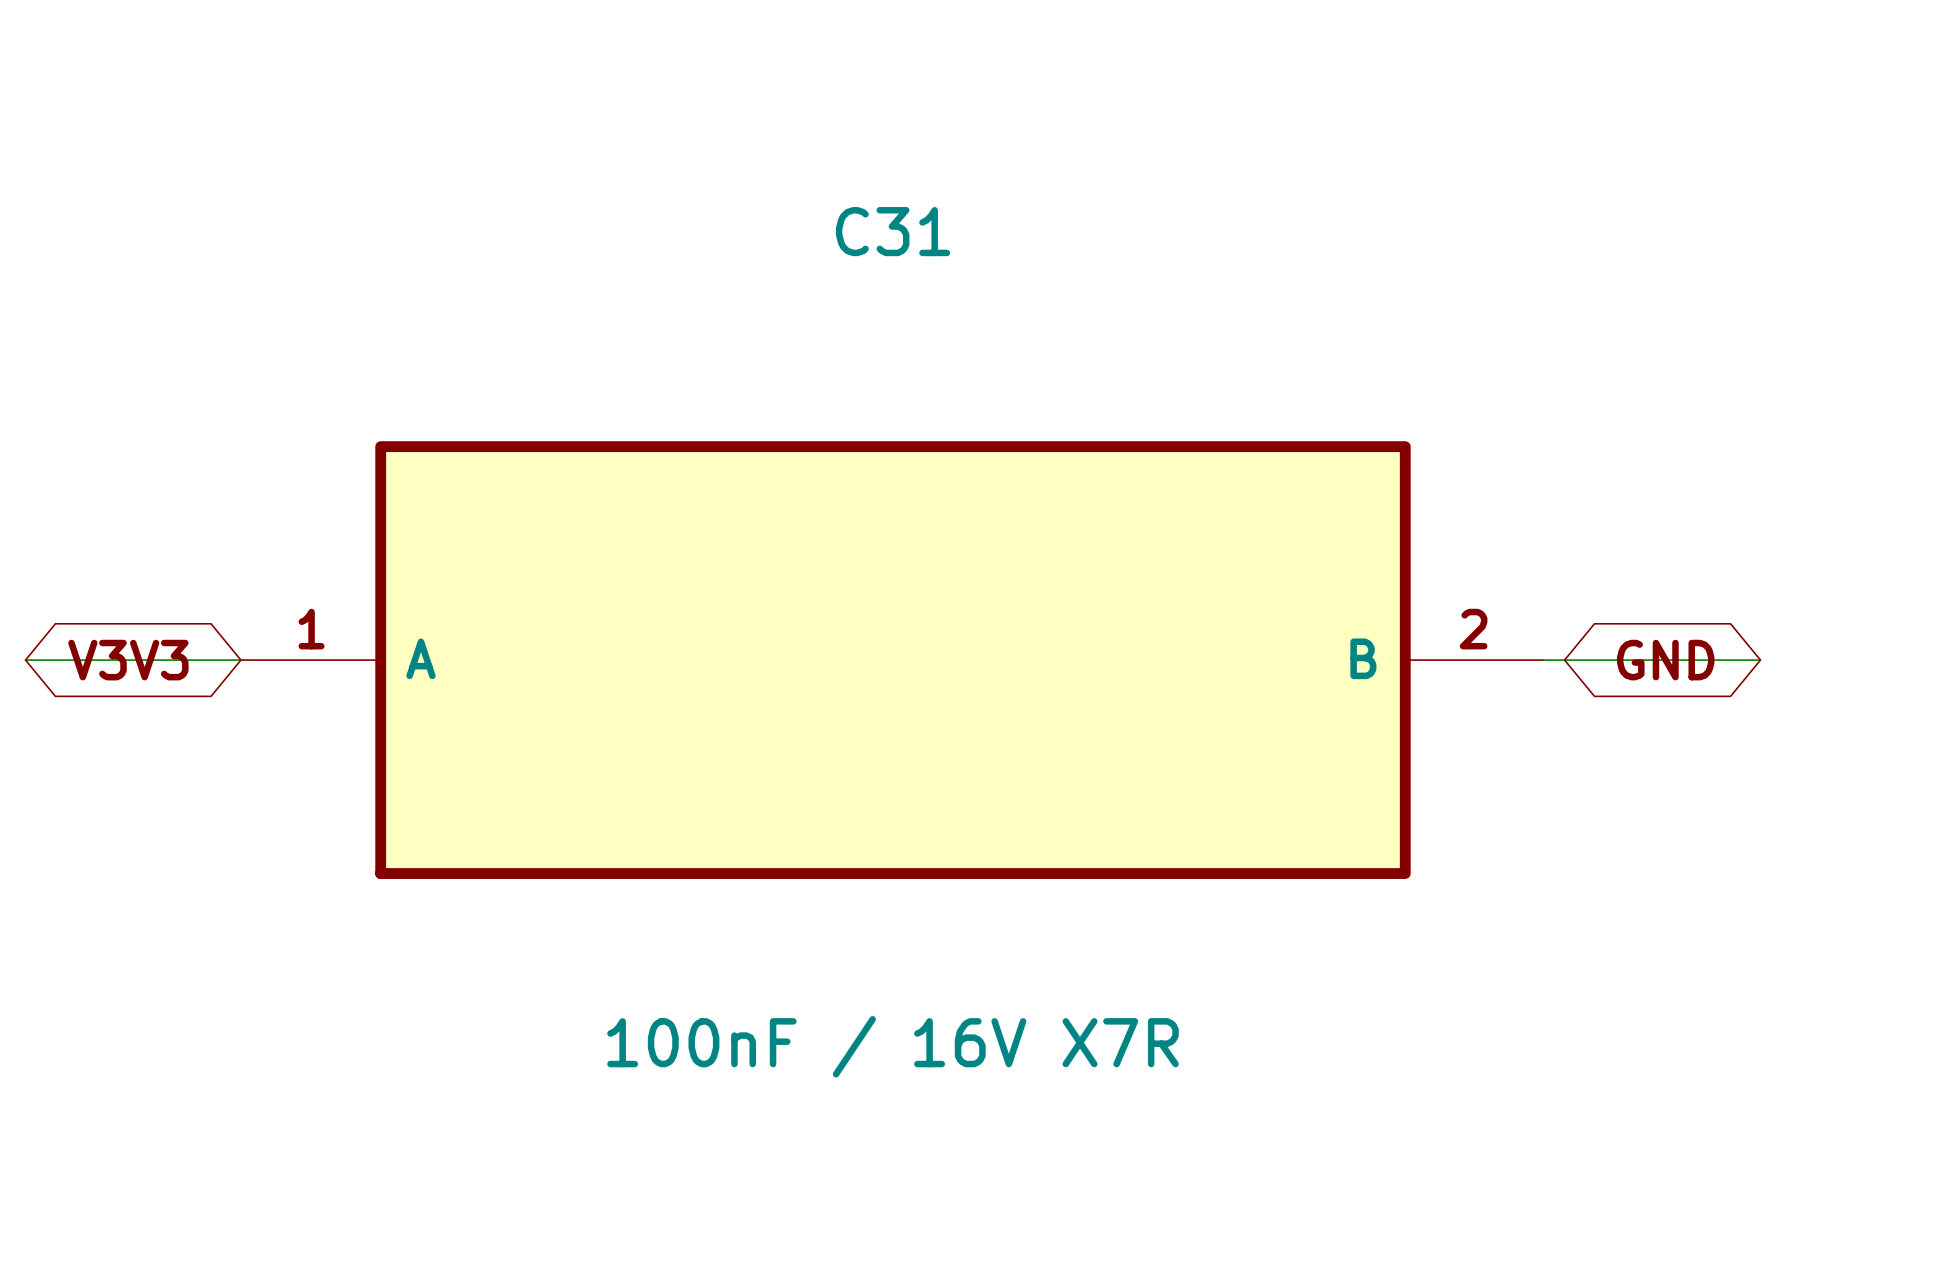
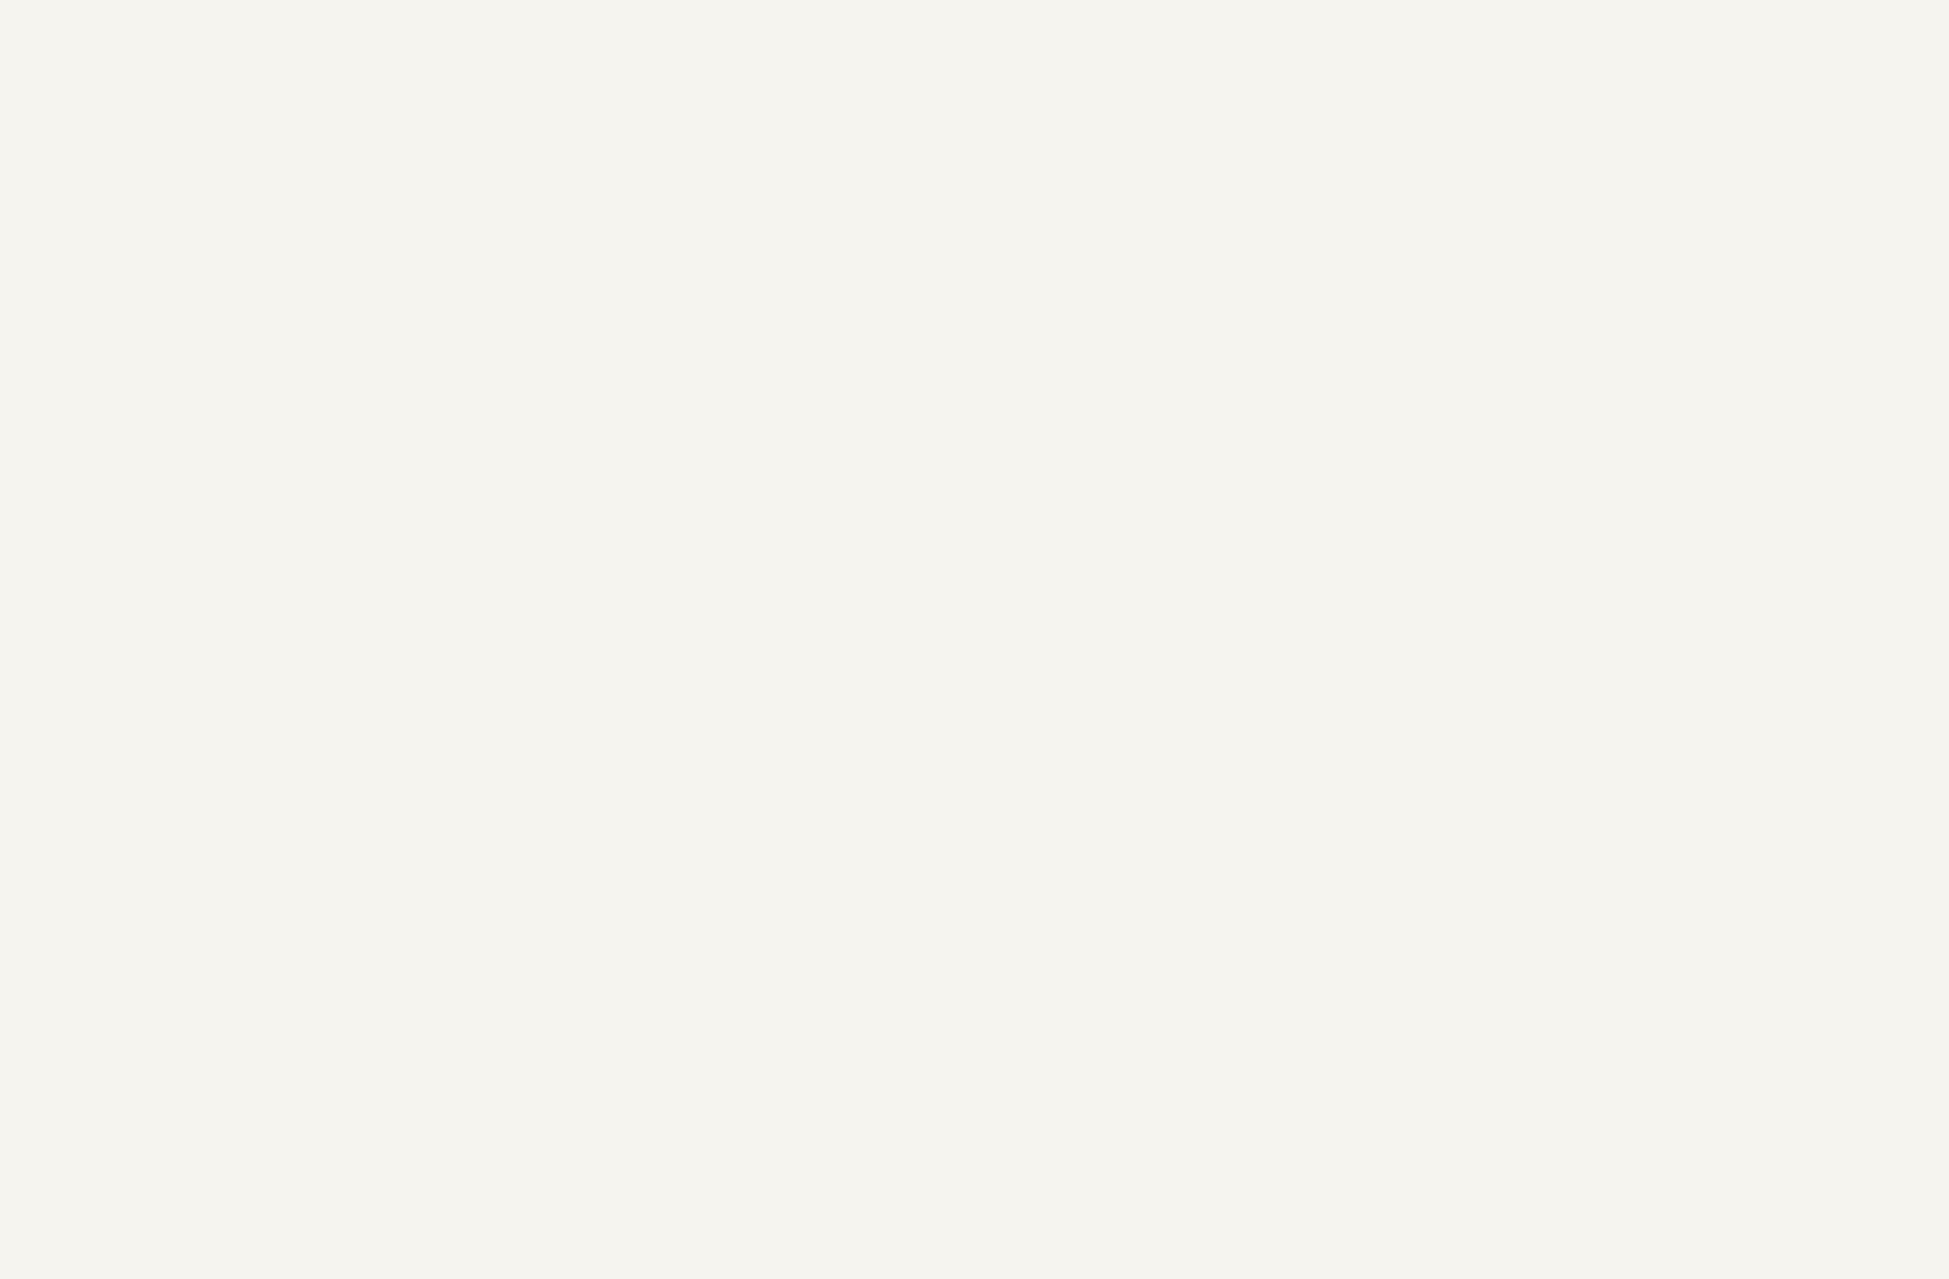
wire: (25, 660) (242, 660) -> none
global label: V3V3 (128, 660) -> none
C31: 100nF / 16V X7R (892, 660) -> none
wire: (1543, 660) (1760, 660) -> none
global label: GND (1665, 660) -> none

